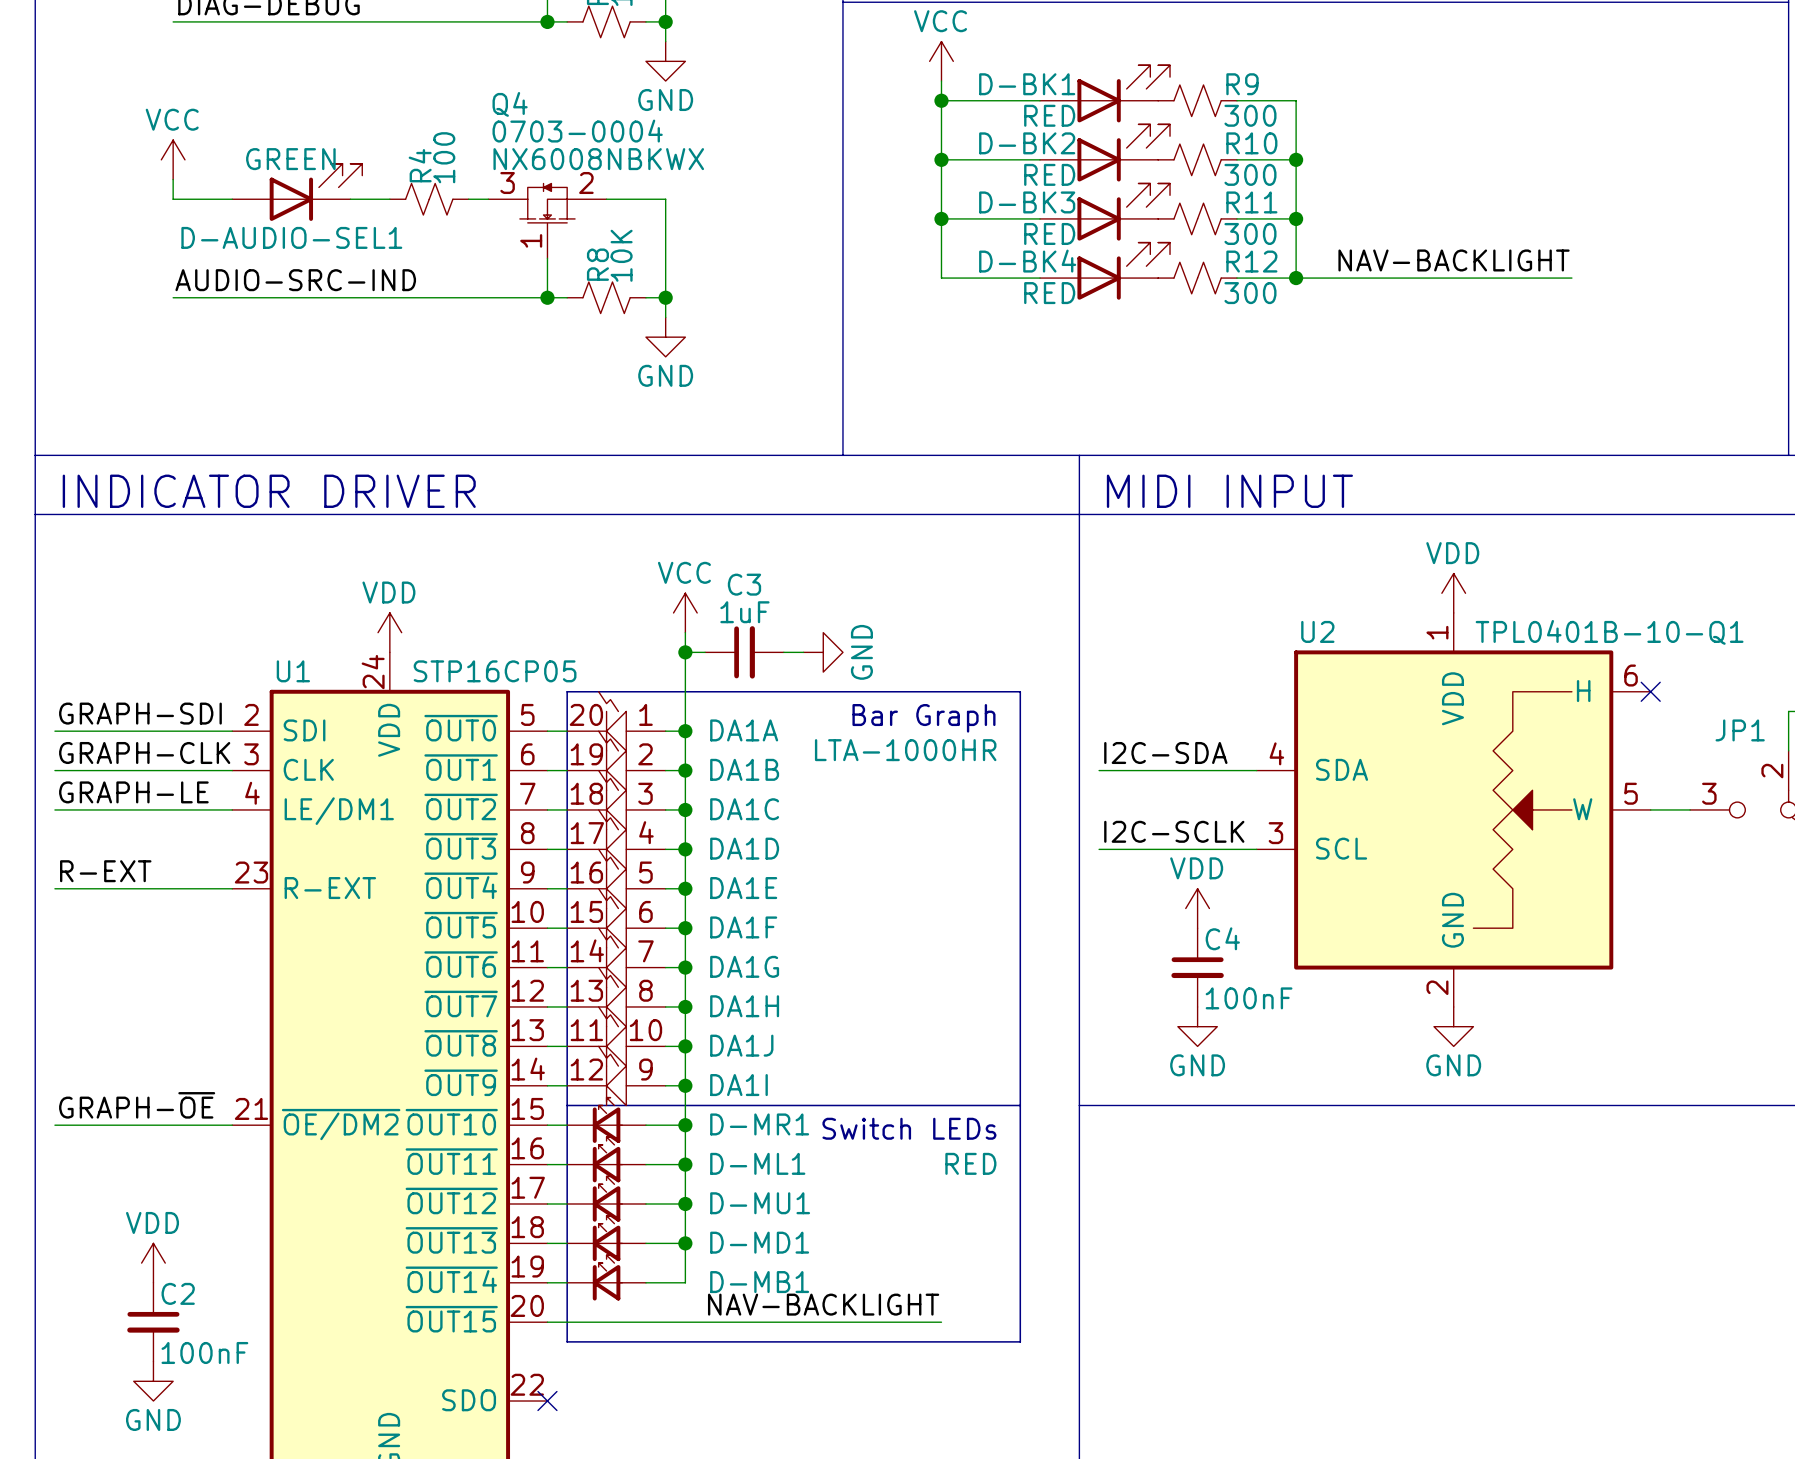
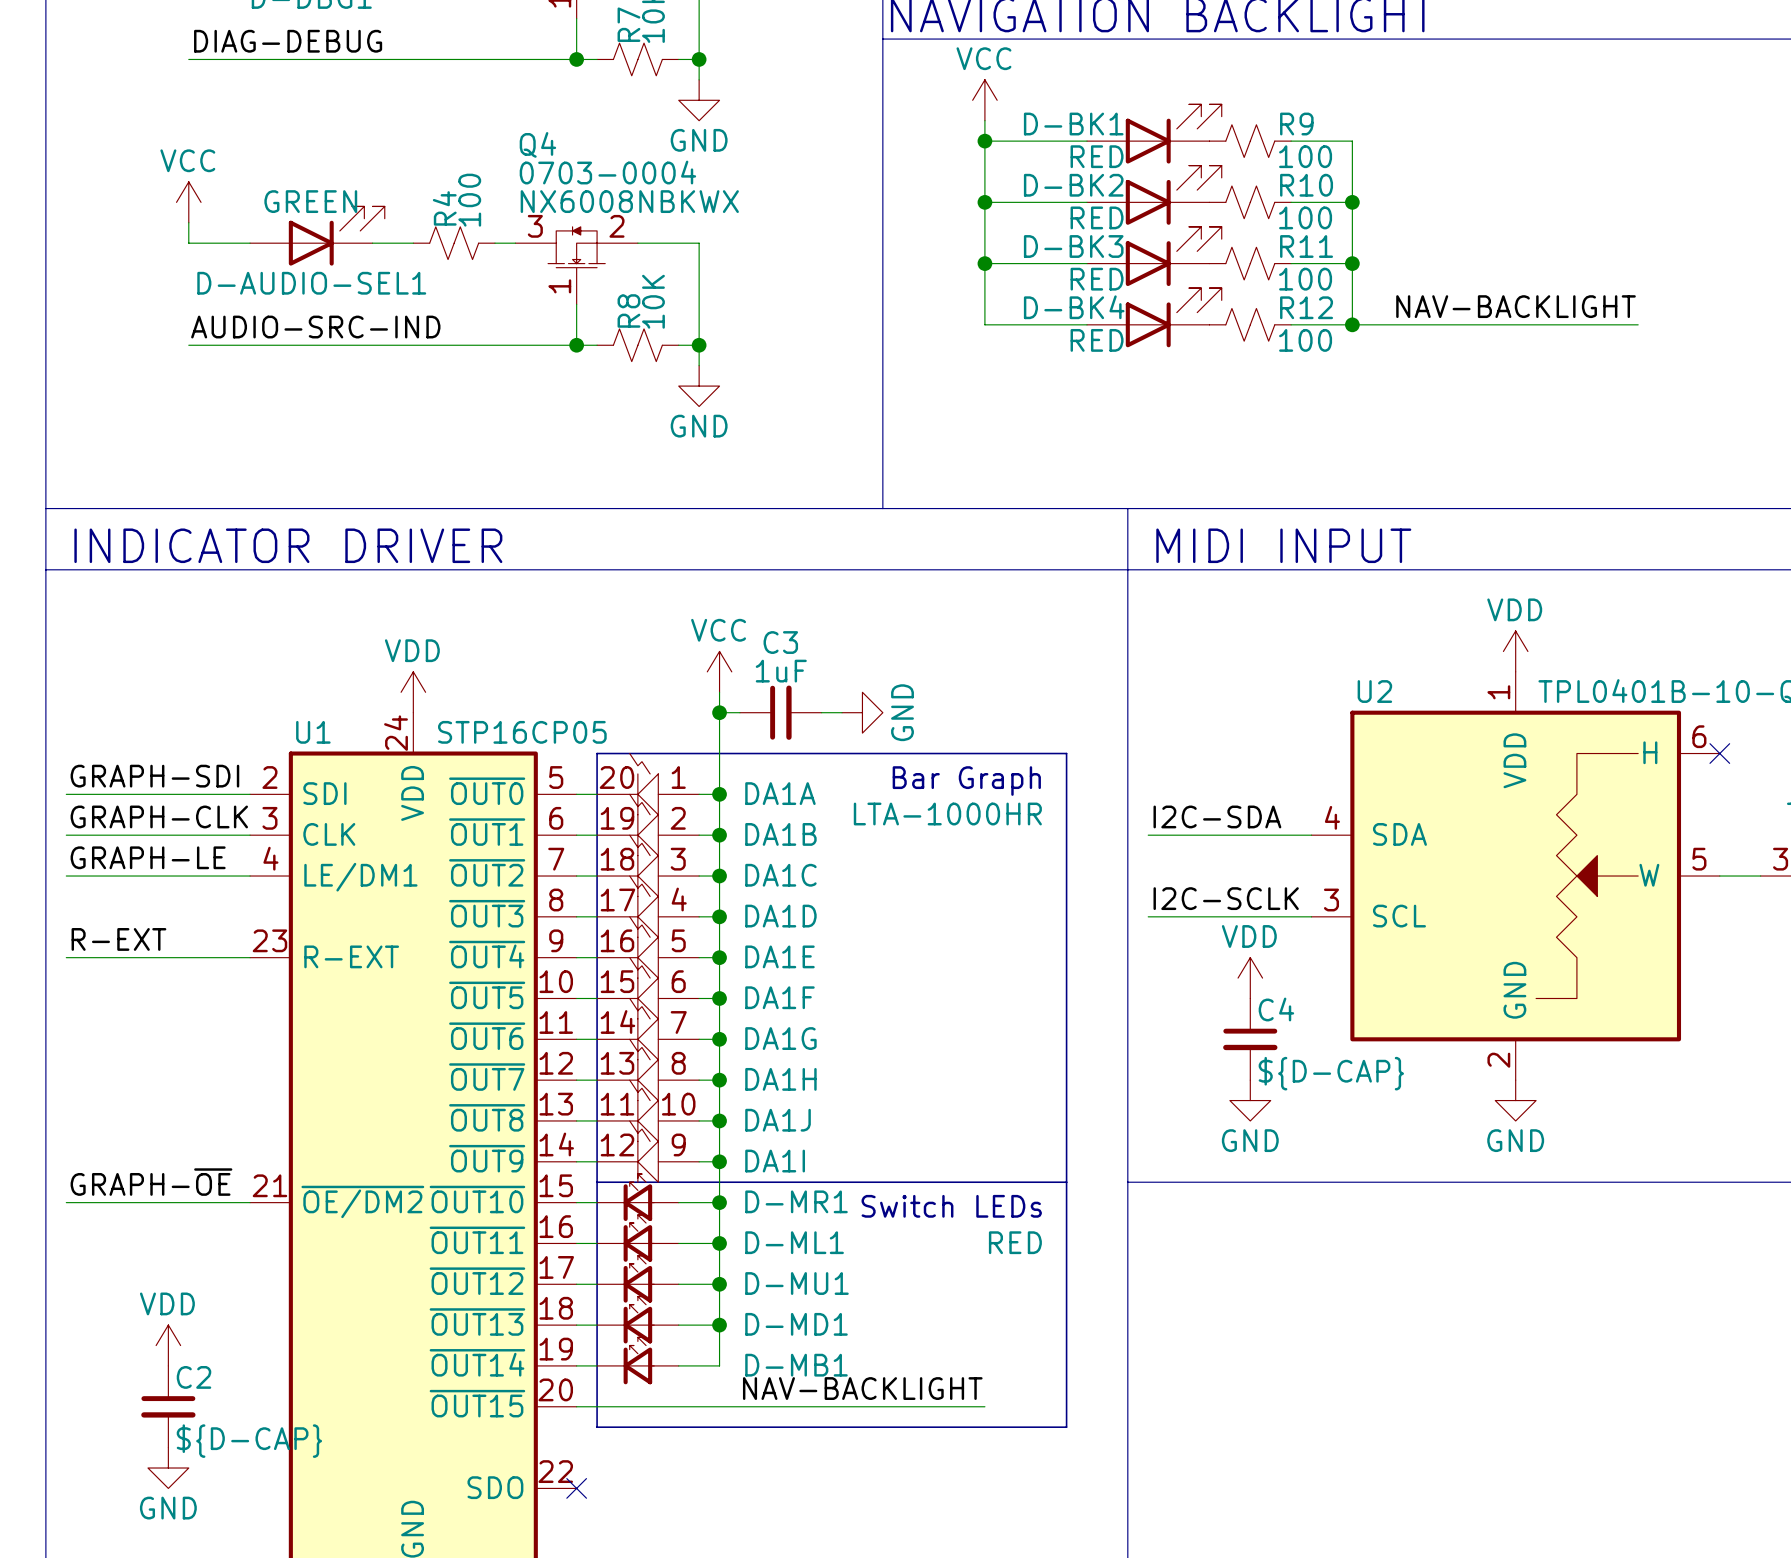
R9 value: 300 (1250, 115) -> 100 (1305, 156)
R10 value: 300 (1250, 174) -> 100 (1305, 217)
R11 value: 300 (1250, 233) -> 100 (1305, 279)
R12 value: 300 (1250, 293) -> 100 (1305, 340)
C4 value: 100nF (1249, 998) -> ${D-CAP} (1331, 1073)
C2 value: 100nF (204, 1352) -> ${D-CAP} (249, 1441)

